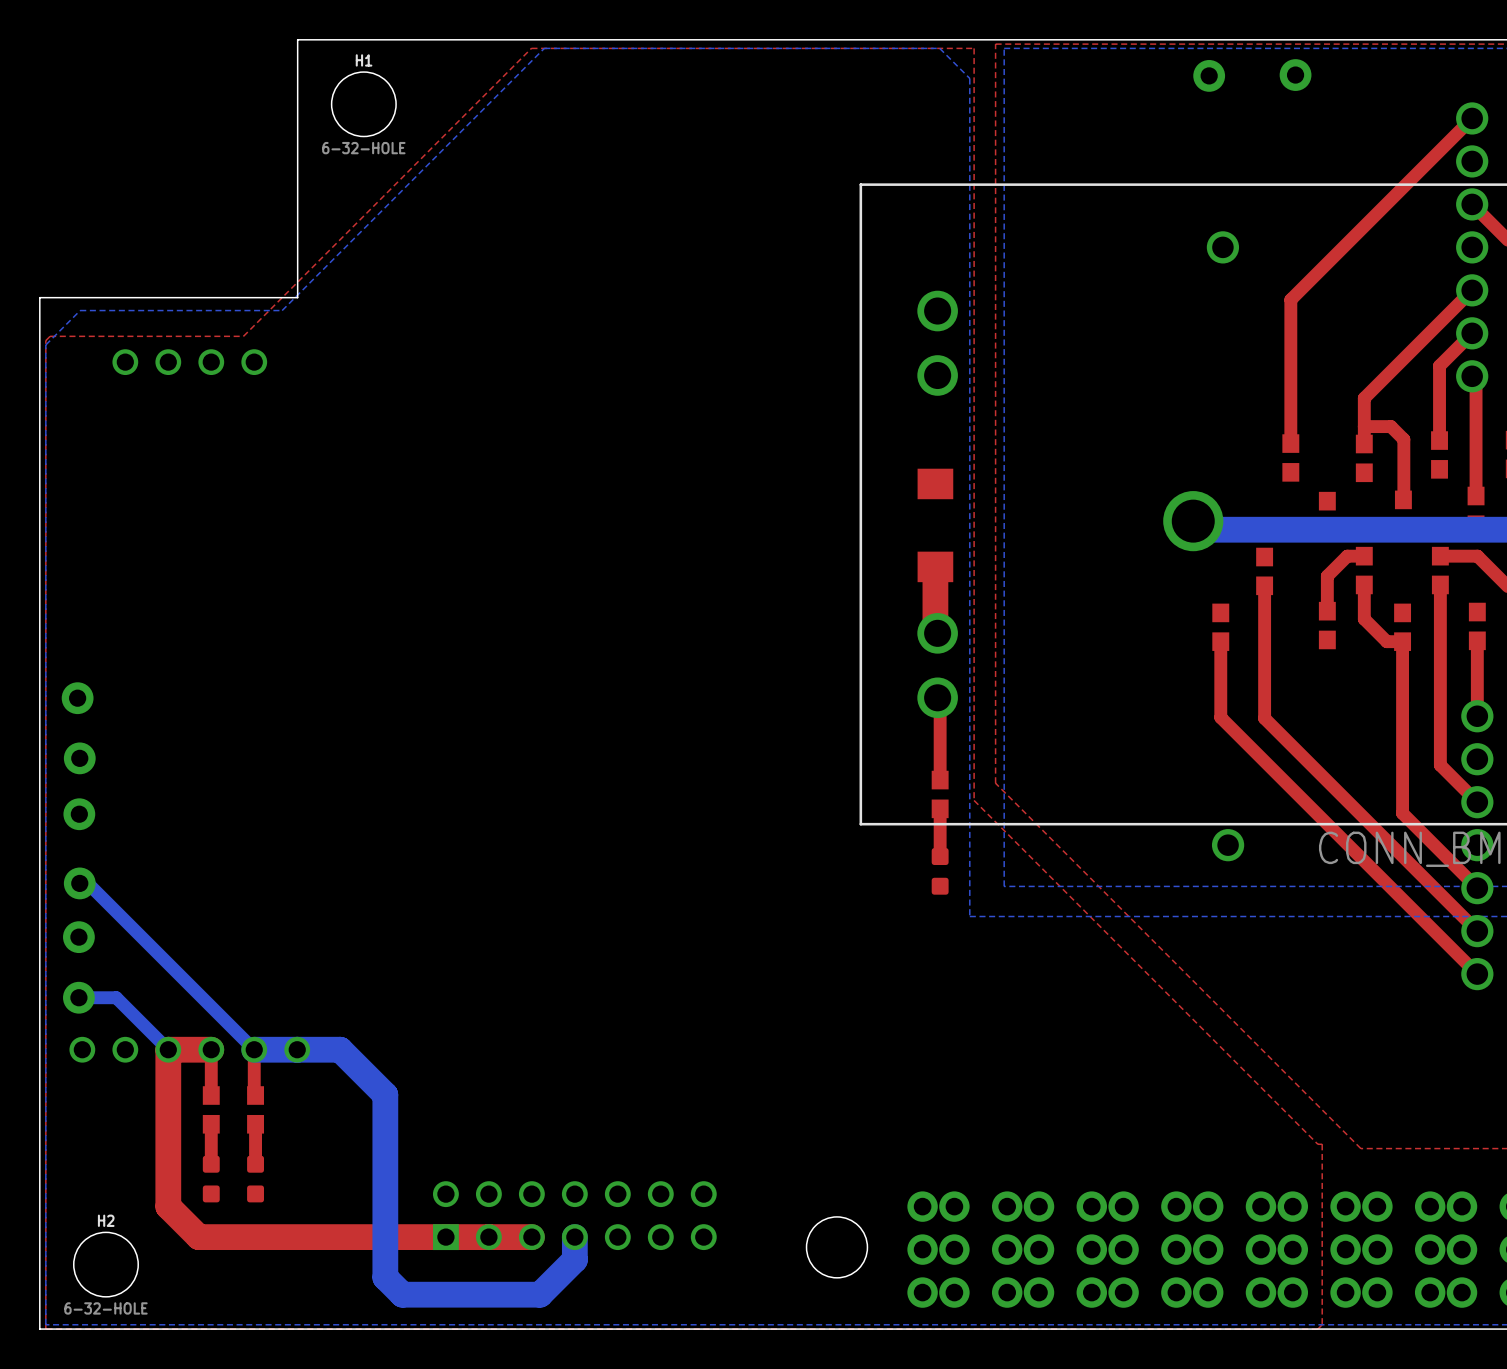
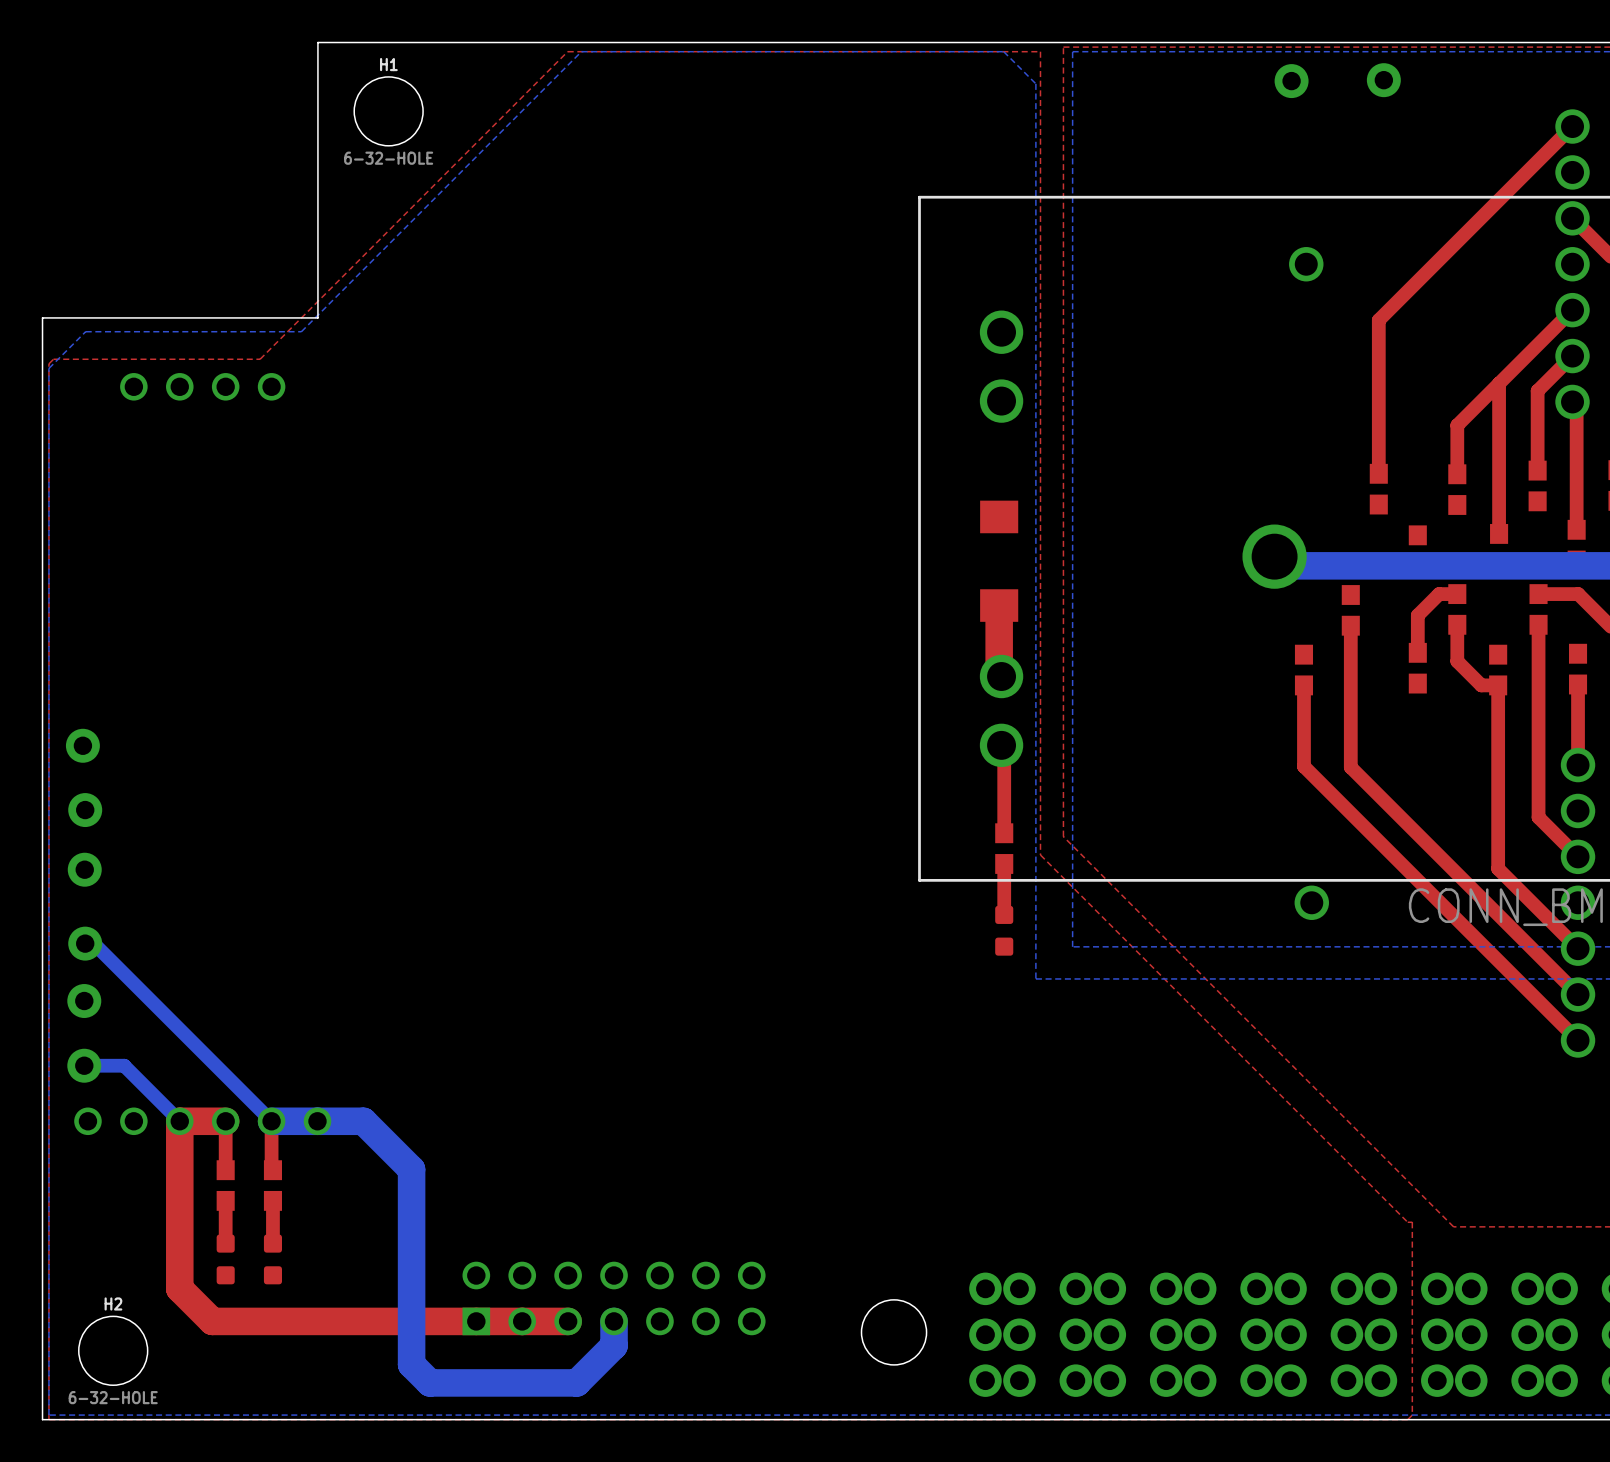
top track: (1364, 426) (1390, 426) (1403, 439) (1403, 499) -> (1499, 383) (1499, 533)

